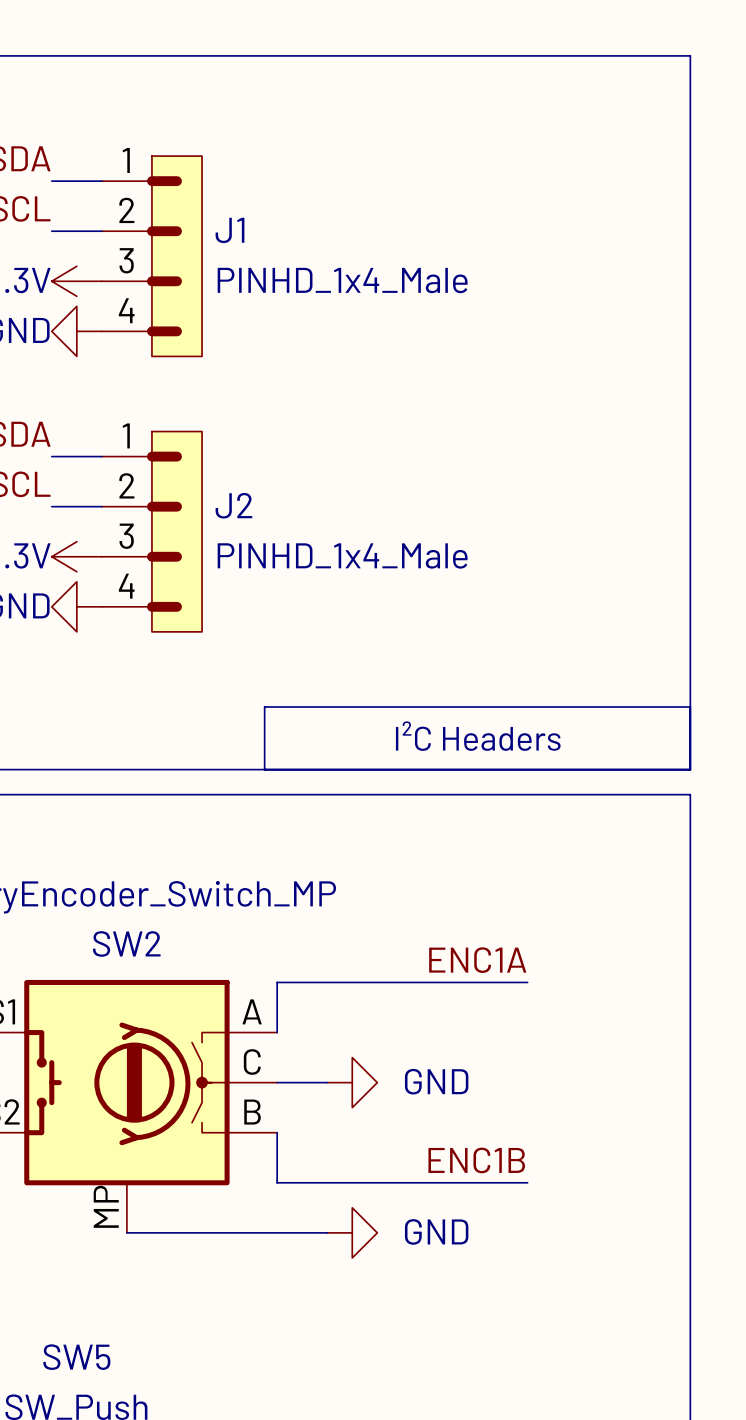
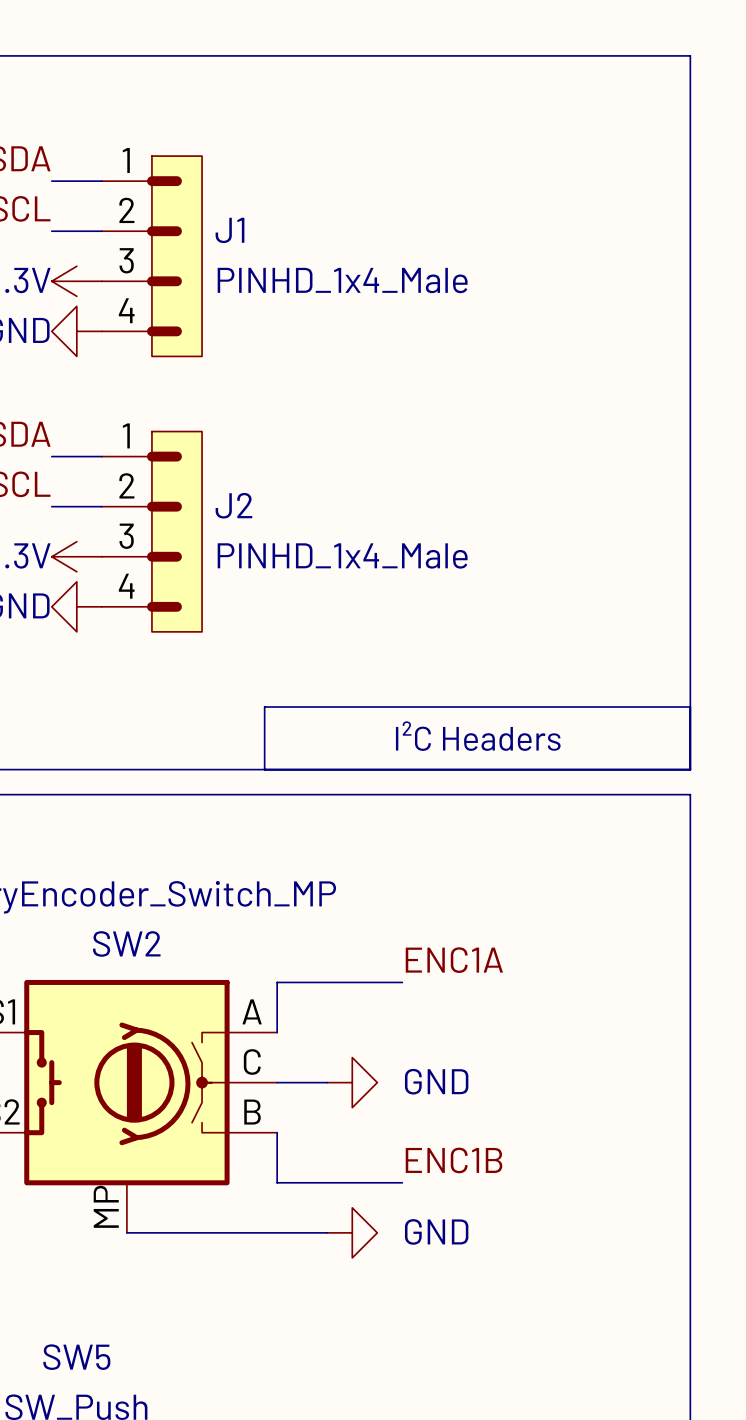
label position: ENC1A (477, 960) -> ENC1A (454, 960)
wire: (402, 982) (527, 982) -> none
label position: ENC1B (476, 1160) -> ENC1B (454, 1160)
wire: (402, 1182) (527, 1182) -> none

